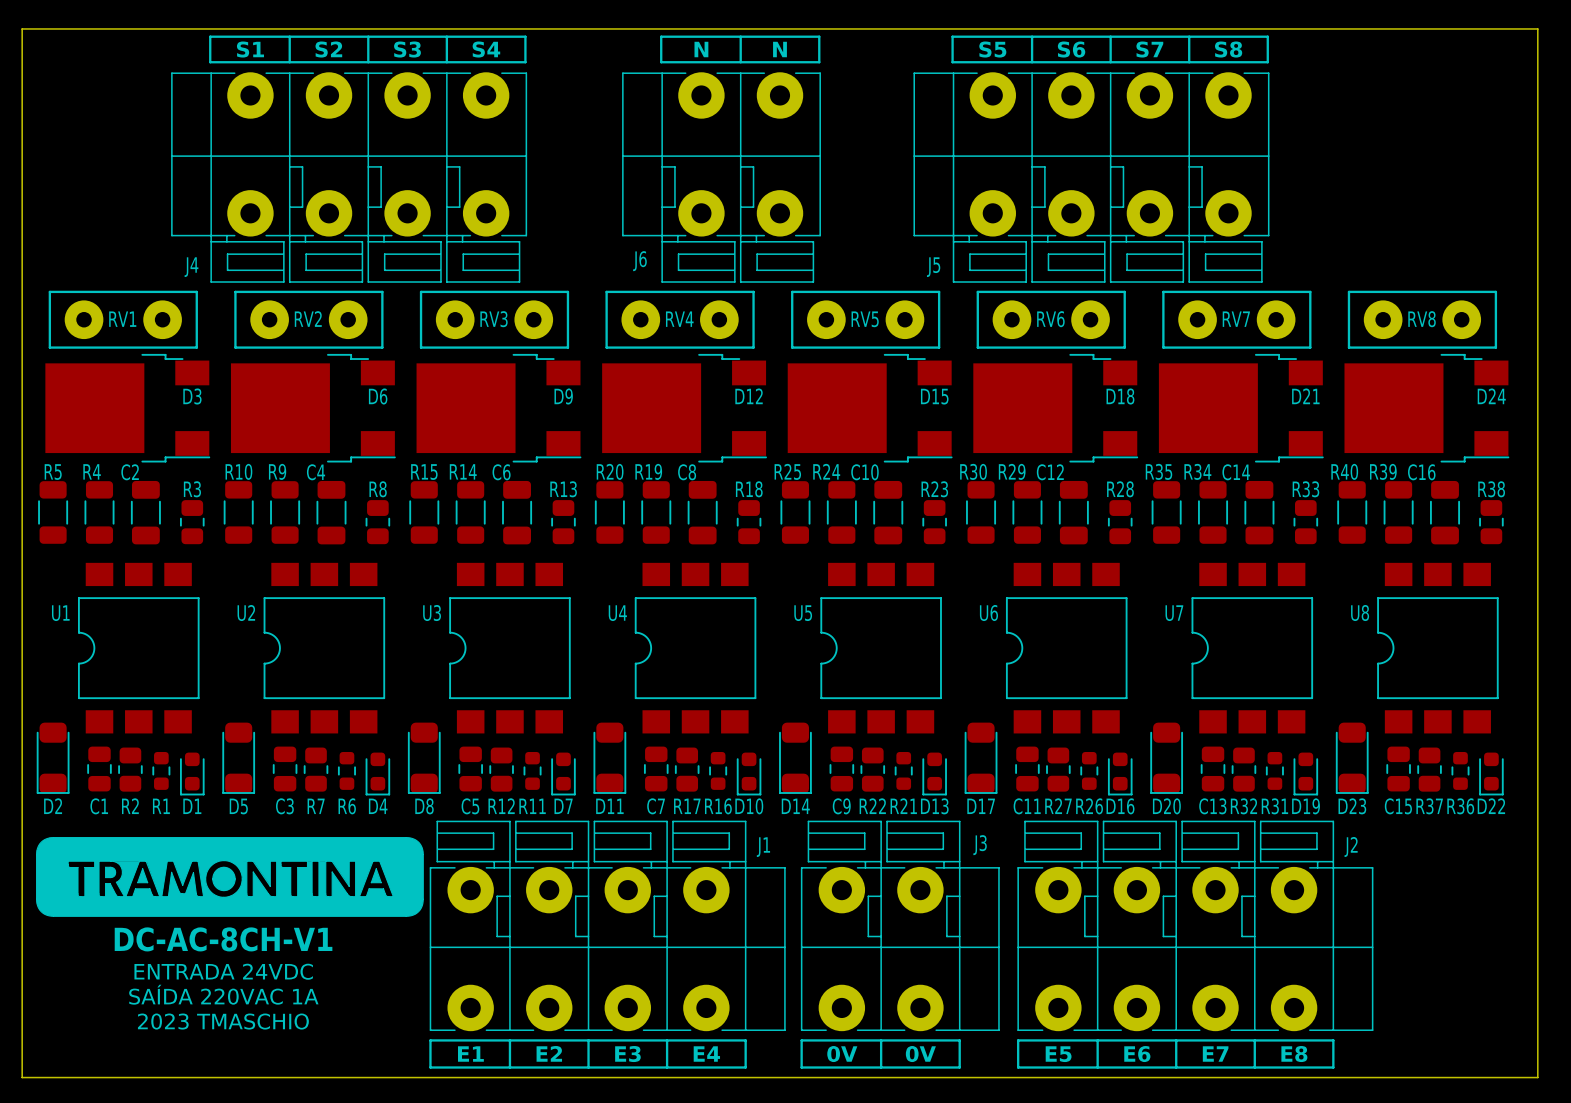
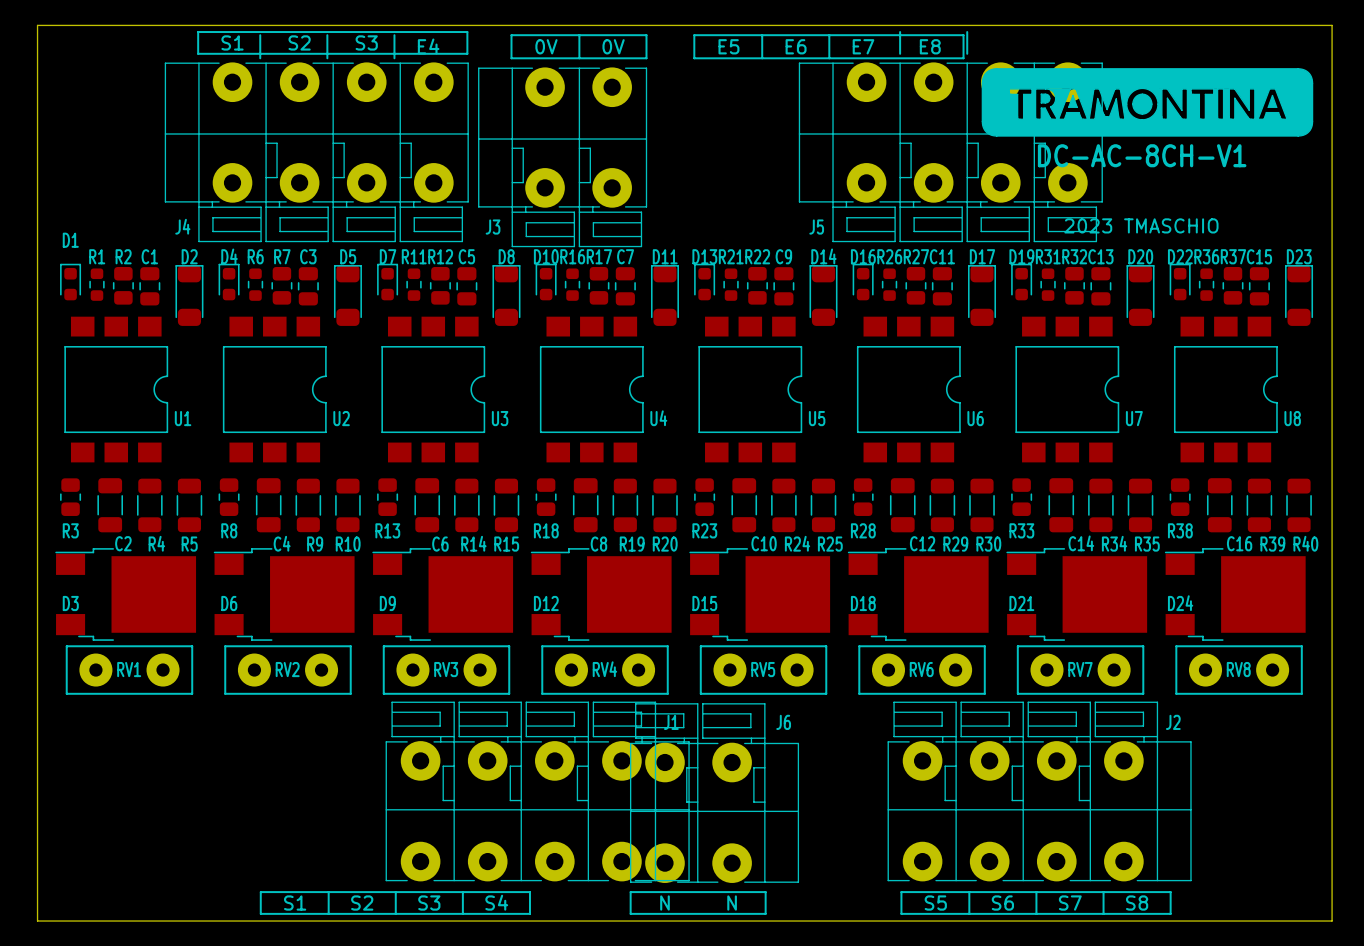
line: (289, 36) (289, 62) -> none
line: (368, 36) (368, 62) -> none
line: (446, 36) (446, 62) -> none
line: (661, 36) (819, 36) (819, 62) (661, 62) (661, 36) -> none
line: (740, 36) (740, 62) -> none
line: (952, 36) (1267, 36) (1267, 62) (952, 62) (952, 36) -> none
line: (1189, 36) (1189, 62) -> none
line: none -> (260, 35) (260, 58)
line: none -> (327, 35) (327, 58)
line: none -> (394, 35) (394, 58)
line: none -> (511, 35) (646, 35) (646, 58) (511, 58) (511, 35)
line: none -> (579, 35) (579, 58)
line: none -> (694, 35) (963, 35) (963, 58) (694, 58) (694, 35)
line: none -> (762, 35) (762, 58)
line: none -> (829, 35) (829, 58)
text: S4 (486, 49) -> E4 (428, 46)
text: N (701, 49) -> 0V (613, 46)
text: N (779, 49) -> none
text: S5 (992, 49) -> E7 (863, 46)
text: S6 (1071, 49) -> E8 (930, 46)
text: S7 (1149, 49) -> none
text: S8 (1228, 49) -> none
text: none -> 0V (546, 46)
text: none -> E5 (728, 46)
text: none -> E6 (796, 46)
J6 footprint: [622, 72, 821, 283] -> [629, 703, 800, 883]
drawing: none -> [982, 68, 1313, 137]
text: none -> DC-AC-8CH-V1 (1142, 155)
J6 name position: J6 (639, 261) -> J6 (783, 722)
text: none -> 2023 TMASCHIO (1141, 225)
RV1 position: (123, 319) -> (129, 670)
RV2 position: (308, 319) -> (287, 670)
RV3 position: (494, 319) -> (446, 670)
RV4 position: (680, 319) -> (605, 670)
RV5 position: (865, 319) -> (763, 670)
RV6 position: (1051, 319) -> (922, 670)
RV7 position: (1236, 319) -> (1080, 670)
RV8 position: (1422, 319) -> (1239, 670)
D3 rotation: 0° (127, 408) -> 180° (125, 594)
D3 position: (127, 408) -> (125, 594)
D6 rotation: 0° (313, 408) -> 180° (284, 594)
D6 position: (313, 408) -> (284, 594)
D9 rotation: 0° (498, 408) -> 180° (442, 594)
D9 position: (498, 408) -> (442, 594)
D12 rotation: 0° (684, 408) -> 180° (601, 594)
D12 position: (684, 408) -> (601, 594)
D15 rotation: 0° (870, 408) -> 180° (759, 594)
D15 position: (870, 408) -> (759, 594)
D18 rotation: 0° (1055, 408) -> 180° (918, 594)
D18 position: (1055, 408) -> (918, 594)
D21 rotation: 0° (1241, 408) -> 180° (1076, 594)
D21 position: (1241, 408) -> (1076, 594)
D24 rotation: 0° (1426, 408) -> 180° (1235, 594)
D24 position: (1426, 408) -> (1235, 594)
R4 name position: R4 (92, 471) -> R4 (156, 543)
R10 name position: R10 (238, 471) -> R10 (348, 544)
R9 name position: R9 (277, 471) -> R9 (315, 544)
R14 name position: R14 (463, 471) -> R14 (473, 543)
R20 name position: R20 (610, 471) -> R20 (665, 544)
R19 name position: R19 (648, 471) -> R19 (632, 544)
R25 name position: R25 (787, 471) -> R25 (830, 544)
R24 name position: R24 (826, 471) -> R24 (797, 543)
R30 name position: R30 (973, 471) -> R30 (988, 544)
R29 name position: R29 (1012, 471) -> R29 (955, 544)
R35 name position: R35 (1158, 471) -> R35 (1147, 544)
R34 name position: R34 (1197, 471) -> R34 (1114, 543)
R40 name position: R40 (1344, 471) -> R40 (1305, 543)
R39 name position: R39 (1383, 471) -> R39 (1272, 544)
R5 name position: R5 (53, 472) -> R5 (189, 544)
C2 name position: C2 (130, 472) -> C2 (123, 543)
C4 name position: C4 (316, 472) -> C4 (282, 543)
R15 name position: R15 (424, 472) -> R15 (506, 544)
C6 name position: C6 (501, 472) -> C6 (440, 544)
C8 name position: C8 (687, 472) -> C8 (598, 544)
C10 name position: C10 (864, 472) -> C10 (764, 543)
C12 name position: C12 (1050, 472) -> C12 (922, 543)
C14 name position: C14 (1236, 472) -> C14 (1081, 543)
C16 name position: C16 (1421, 472) -> C16 (1239, 543)
R3 name position: R3 (192, 489) -> R3 (70, 530)
R8 name position: R8 (378, 489) -> R8 (229, 530)
R13 name position: R13 (563, 489) -> R13 (387, 530)
R18 name position: R18 (749, 489) -> R18 (546, 530)
R23 name position: R23 (934, 489) -> R23 (704, 530)
R28 name position: R28 (1120, 489) -> R28 (863, 530)
R33 name position: R33 (1305, 489) -> R33 (1021, 530)
R38 name position: R38 (1491, 489) -> R38 (1180, 530)
R5 position: (53, 512) -> (189, 505)
R4 position: (99, 512) -> (149, 505)
C2 position: (145, 512) -> (110, 505)
R10 position: (238, 512) -> (347, 505)
R9 position: (285, 512) -> (308, 505)
C4 position: (331, 512) -> (268, 505)
R15 position: (424, 512) -> (506, 505)
R14 position: (470, 512) -> (466, 505)
C6 position: (517, 512) -> (427, 505)
R20 position: (609, 512) -> (664, 505)
R19 position: (656, 512) -> (625, 505)
C8 position: (702, 512) -> (585, 505)
R25 position: (795, 512) -> (823, 505)
R24 position: (841, 512) -> (783, 505)
C10 position: (888, 512) -> (744, 505)
R30 position: (981, 512) -> (982, 505)
R29 position: (1027, 512) -> (942, 505)
C12 position: (1073, 512) -> (902, 505)
R35 position: (1166, 512) -> (1140, 505)
R34 position: (1213, 512) -> (1100, 505)
C14 position: (1259, 512) -> (1061, 505)
R40 position: (1352, 512) -> (1299, 505)
R39 position: (1398, 512) -> (1259, 505)
C16 position: (1445, 512) -> (1219, 505)
R3 position: (192, 522) -> (70, 497)
R8 position: (377, 522) -> (229, 497)
R13 position: (563, 522) -> (387, 497)
R18 position: (749, 522) -> (546, 497)
R23 position: (934, 522) -> (704, 497)
R28 position: (1120, 522) -> (863, 497)
R33 position: (1305, 522) -> (1021, 497)
R38 position: (1491, 522) -> (1180, 497)
U1 rotation: 0° (138, 648) -> 180° (116, 389)
U1 position: (138, 648) -> (116, 389)
U2 rotation: 0° (324, 648) -> 180° (274, 389)
U2 position: (324, 648) -> (274, 389)
U3 rotation: 0° (509, 648) -> 180° (433, 389)
U3 position: (509, 648) -> (433, 389)
U4 rotation: 0° (695, 648) -> 180° (591, 389)
U4 position: (695, 648) -> (591, 389)
U5 rotation: 0° (881, 648) -> 180° (750, 389)
U5 position: (881, 648) -> (750, 389)
U6 rotation: 0° (1066, 648) -> 180° (908, 389)
U6 position: (1066, 648) -> (908, 389)
U7 rotation: 0° (1252, 648) -> 180° (1067, 389)
U7 position: (1252, 648) -> (1067, 389)
U8 rotation: 0° (1437, 648) -> 180° (1225, 389)
U8 position: (1437, 648) -> (1225, 389)
D2 rotation: 0° (53, 758) -> 180° (189, 295)
D2 position: (53, 758) -> (189, 295)
D5 rotation: 0° (238, 758) -> 180° (347, 295)
D5 position: (238, 758) -> (347, 295)
D8 rotation: 0° (424, 758) -> 180° (506, 295)
D8 position: (424, 758) -> (506, 295)
D11 rotation: 0° (609, 758) -> 180° (664, 295)
D11 position: (609, 758) -> (664, 295)
D14 rotation: 0° (795, 758) -> 180° (823, 295)
D14 position: (795, 758) -> (823, 295)
D17 rotation: 0° (981, 758) -> 180° (982, 295)
D17 position: (981, 758) -> (982, 295)
D20 rotation: 0° (1166, 758) -> 180° (1140, 295)
D20 position: (1166, 758) -> (1140, 295)
D23 rotation: 0° (1352, 758) -> 180° (1299, 295)
D23 position: (1352, 758) -> (1299, 295)
C1 position: (99, 769) -> (149, 286)
R2 position: (130, 769) -> (123, 285)
C3 position: (285, 769) -> (308, 286)
R7 position: (316, 769) -> (281, 285)
C5 position: (470, 769) -> (466, 286)
R12 position: (501, 769) -> (440, 285)
C7 position: (656, 769) -> (625, 286)
R17 position: (687, 769) -> (598, 285)
C9 position: (841, 769) -> (783, 286)
R22 position: (872, 769) -> (757, 285)
C11 position: (1027, 769) -> (942, 286)
R27 position: (1058, 769) -> (915, 285)
C13 position: (1213, 769) -> (1100, 286)
R32 position: (1243, 769) -> (1074, 285)
C15 position: (1398, 769) -> (1259, 286)
R37 position: (1429, 769) -> (1232, 285)
R1 position: (161, 770) -> (96, 284)
R6 position: (346, 770) -> (255, 284)
R11 position: (532, 770) -> (414, 284)
R16 position: (718, 770) -> (572, 284)
R21 position: (903, 770) -> (731, 284)
R26 position: (1089, 770) -> (889, 284)
R31 position: (1274, 770) -> (1048, 284)
R36 position: (1460, 770) -> (1206, 284)
D1 rotation: 0° (192, 774) -> 180° (70, 282)
D1 position: (192, 774) -> (70, 282)
D4 rotation: 0° (377, 774) -> 180° (229, 282)
D4 position: (377, 774) -> (229, 282)
D7 rotation: 0° (563, 774) -> 180° (387, 282)
D7 position: (563, 774) -> (387, 282)
D10 rotation: 0° (749, 774) -> 180° (546, 282)
D10 position: (749, 774) -> (546, 282)
D13 rotation: 0° (934, 774) -> 180° (704, 282)
D13 position: (934, 774) -> (704, 282)
D16 rotation: 0° (1120, 774) -> 180° (863, 282)
D16 position: (1120, 774) -> (863, 282)
D19 rotation: 0° (1305, 774) -> 180° (1021, 282)
D19 position: (1305, 774) -> (1021, 282)
D22 rotation: 0° (1491, 774) -> 180° (1180, 282)
D22 position: (1491, 774) -> (1180, 282)
C1 name position: C1 (99, 806) -> C1 (149, 256)
R2 name position: R2 (130, 806) -> R2 (123, 256)
R1 name position: R1 (161, 806) -> R1 (97, 256)
C3 name position: C3 (284, 806) -> C3 (308, 256)
R7 name position: R7 (316, 806) -> R7 (282, 256)
R6 name position: R6 (347, 806) -> R6 (255, 256)
C5 name position: C5 (470, 806) -> C5 (466, 256)
R12 name position: R12 (501, 806) -> R12 (440, 256)
R11 name position: R11 (532, 806) -> R11 (414, 256)
C7 name position: C7 (656, 806) -> C7 (625, 256)
R17 name position: R17 (687, 806) -> R17 (599, 256)
R16 name position: R16 (718, 806) -> R16 (572, 256)
C9 name position: C9 (841, 806) -> C9 (783, 256)
R22 name position: R22 (872, 806) -> R22 (757, 256)
R21 name position: R21 (903, 806) -> R21 (731, 256)
C11 name position: C11 (1027, 806) -> C11 (942, 256)
R27 name position: R27 (1058, 806) -> R27 (916, 256)
R26 name position: R26 (1089, 806) -> R26 (889, 256)
C13 name position: C13 (1212, 806) -> C13 (1100, 256)
R32 name position: R32 (1243, 806) -> R32 (1074, 256)
R31 name position: R31 (1274, 806) -> R31 (1048, 256)
C15 name position: C15 (1398, 806) -> C15 (1259, 256)
R37 name position: R37 (1429, 806) -> R37 (1233, 256)
R36 name position: R36 (1460, 806) -> R36 (1206, 256)
J3 footprint: [800, 820, 1000, 1032] -> [478, 67, 648, 248]
drawing: [36, 837, 424, 917] -> none
J3 name position: J3 (980, 845) -> J3 (493, 227)
text: DC-AC-8CH-V1 (223, 939) -> none
text: ENTRADA 24VDC (223, 971) -> none
text: SAÍDA 220VAC 1A (223, 994) -> none
text: 2023 TMASCHIO (223, 1021) -> none
line: (430, 1040) (745, 1040) (745, 1067) (430, 1067) (430, 1040) -> none
line: (509, 1040) (509, 1067) -> none
line: (588, 1040) (588, 1067) -> none
line: (667, 1040) (667, 1067) -> none
line: (801, 1040) (959, 1040) (959, 1067) (801, 1067) (801, 1040) -> none
line: (881, 1040) (881, 1067) -> none
line: (1018, 1040) (1333, 1040) (1333, 1067) (1018, 1067) (1018, 1040) -> (901, 892) (901, 913) (1170, 913) (1170, 892) (901, 892)
line: (1097, 1040) (1097, 1067) -> none
line: (1176, 1040) (1176, 1067) -> none
line: (1254, 1040) (1254, 1067) -> none
line: none -> (260, 892) (529, 892) (529, 913) (260, 913) (260, 892)
line: none -> (328, 892) (328, 913)
line: none -> (395, 892) (395, 913)
line: none -> (462, 892) (462, 913)
line: none -> (630, 892) (630, 913) (765, 913) (765, 892) (630, 892)
line: none -> (969, 892) (969, 913)
line: none -> (1036, 892) (1036, 913)
line: none -> (1103, 892) (1103, 913)
text: E2 (549, 1053) -> S4 (496, 902)
text: E1 (470, 1054) -> S3 (429, 903)
text: E3 (627, 1054) -> none
text: E4 (706, 1054) -> none
text: 0V (842, 1054) -> N (732, 903)
text: 0V (920, 1054) -> none
text: E5 (1058, 1054) -> none
text: E6 (1137, 1054) -> none
text: E7 (1215, 1054) -> none
text: E8 (1294, 1054) -> none
text: none -> S1 (295, 903)
text: none -> S2 (362, 903)
text: none -> N (664, 903)
text: none -> S5 (935, 903)
text: none -> S6 (1002, 903)
text: none -> S7 (1070, 903)
text: none -> S8 (1137, 903)

